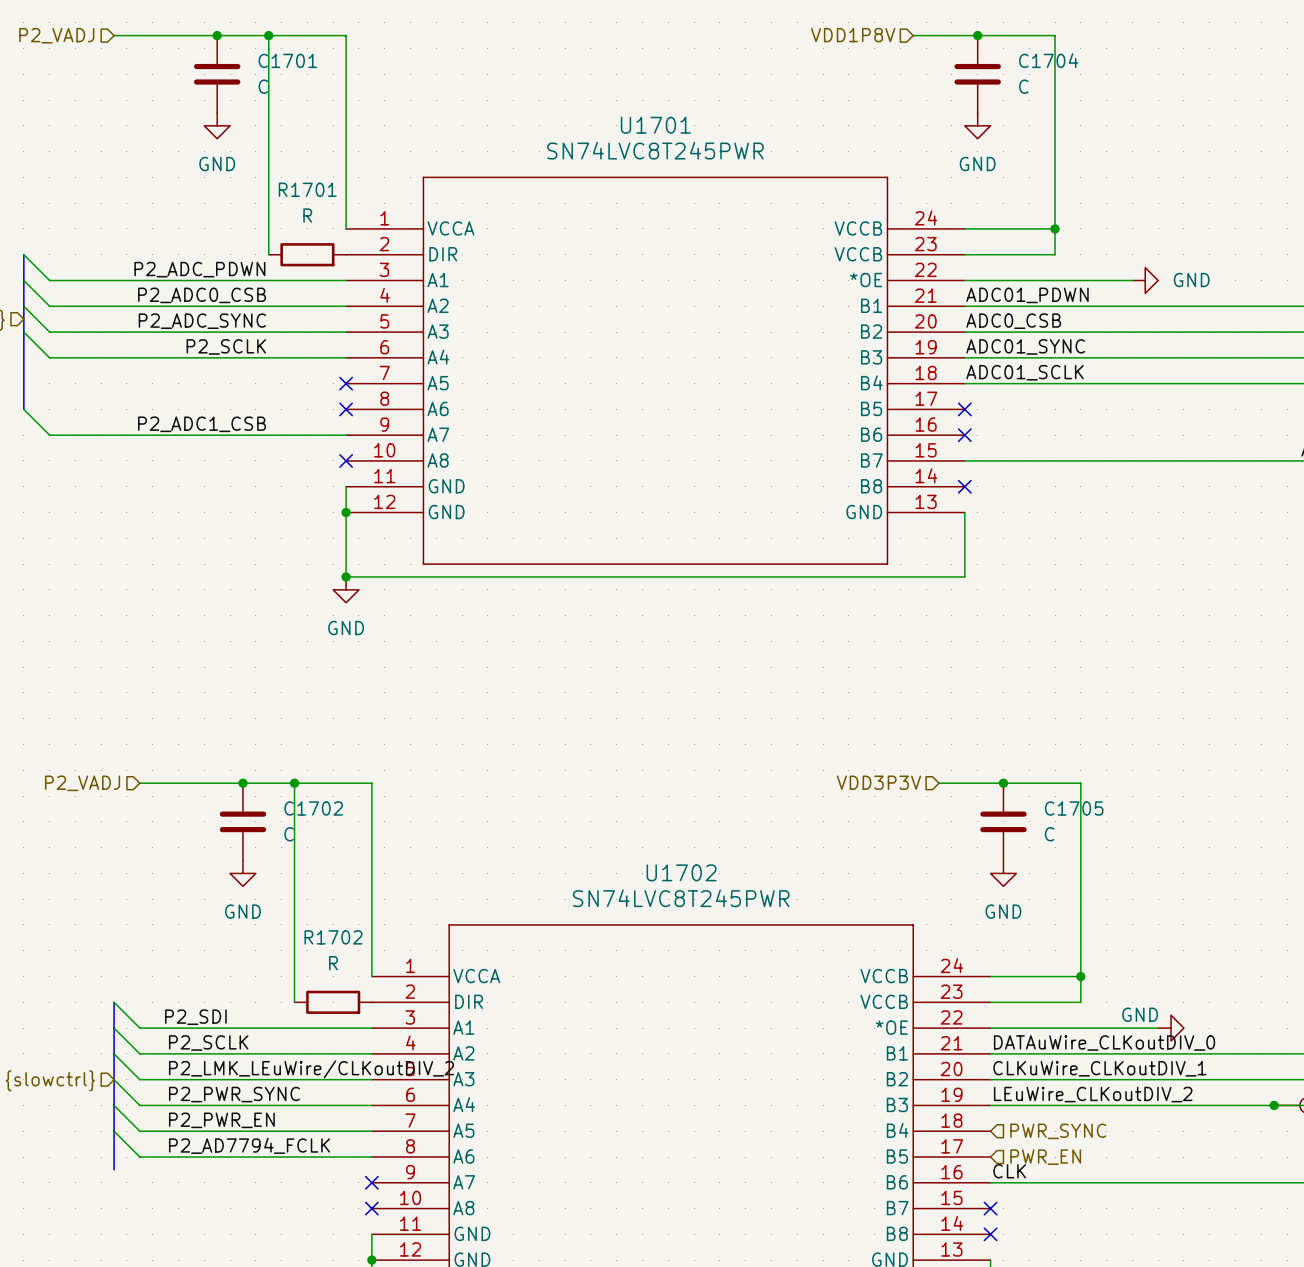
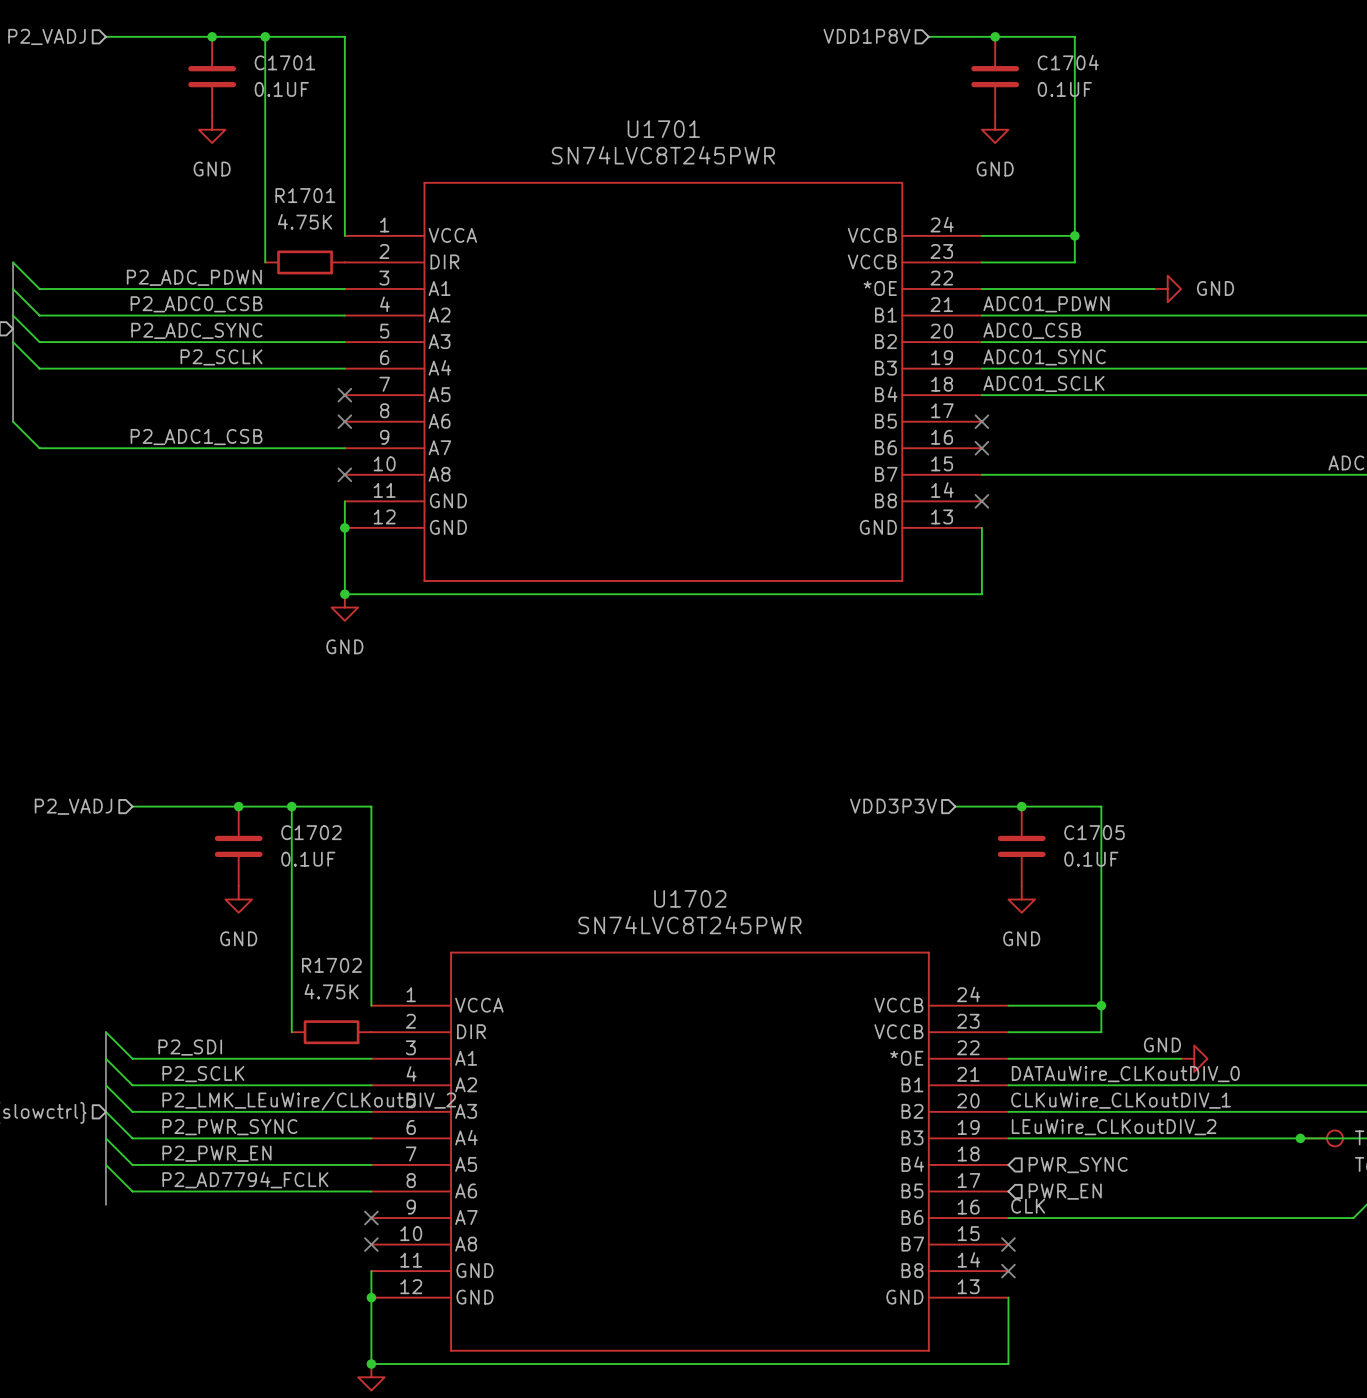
C1701 value: C (263, 86) -> 0.1UF (281, 89)
C1704 value: C (1023, 86) -> 0.1UF (1064, 89)
R1701 value: R (307, 215) -> 4.75K (305, 221)
C1702 value: C (289, 834) -> 0.1UF (308, 859)
C1705 value: C (1049, 834) -> 0.1UF (1091, 859)
R1702 value: R (333, 963) -> 4.75K (331, 991)

